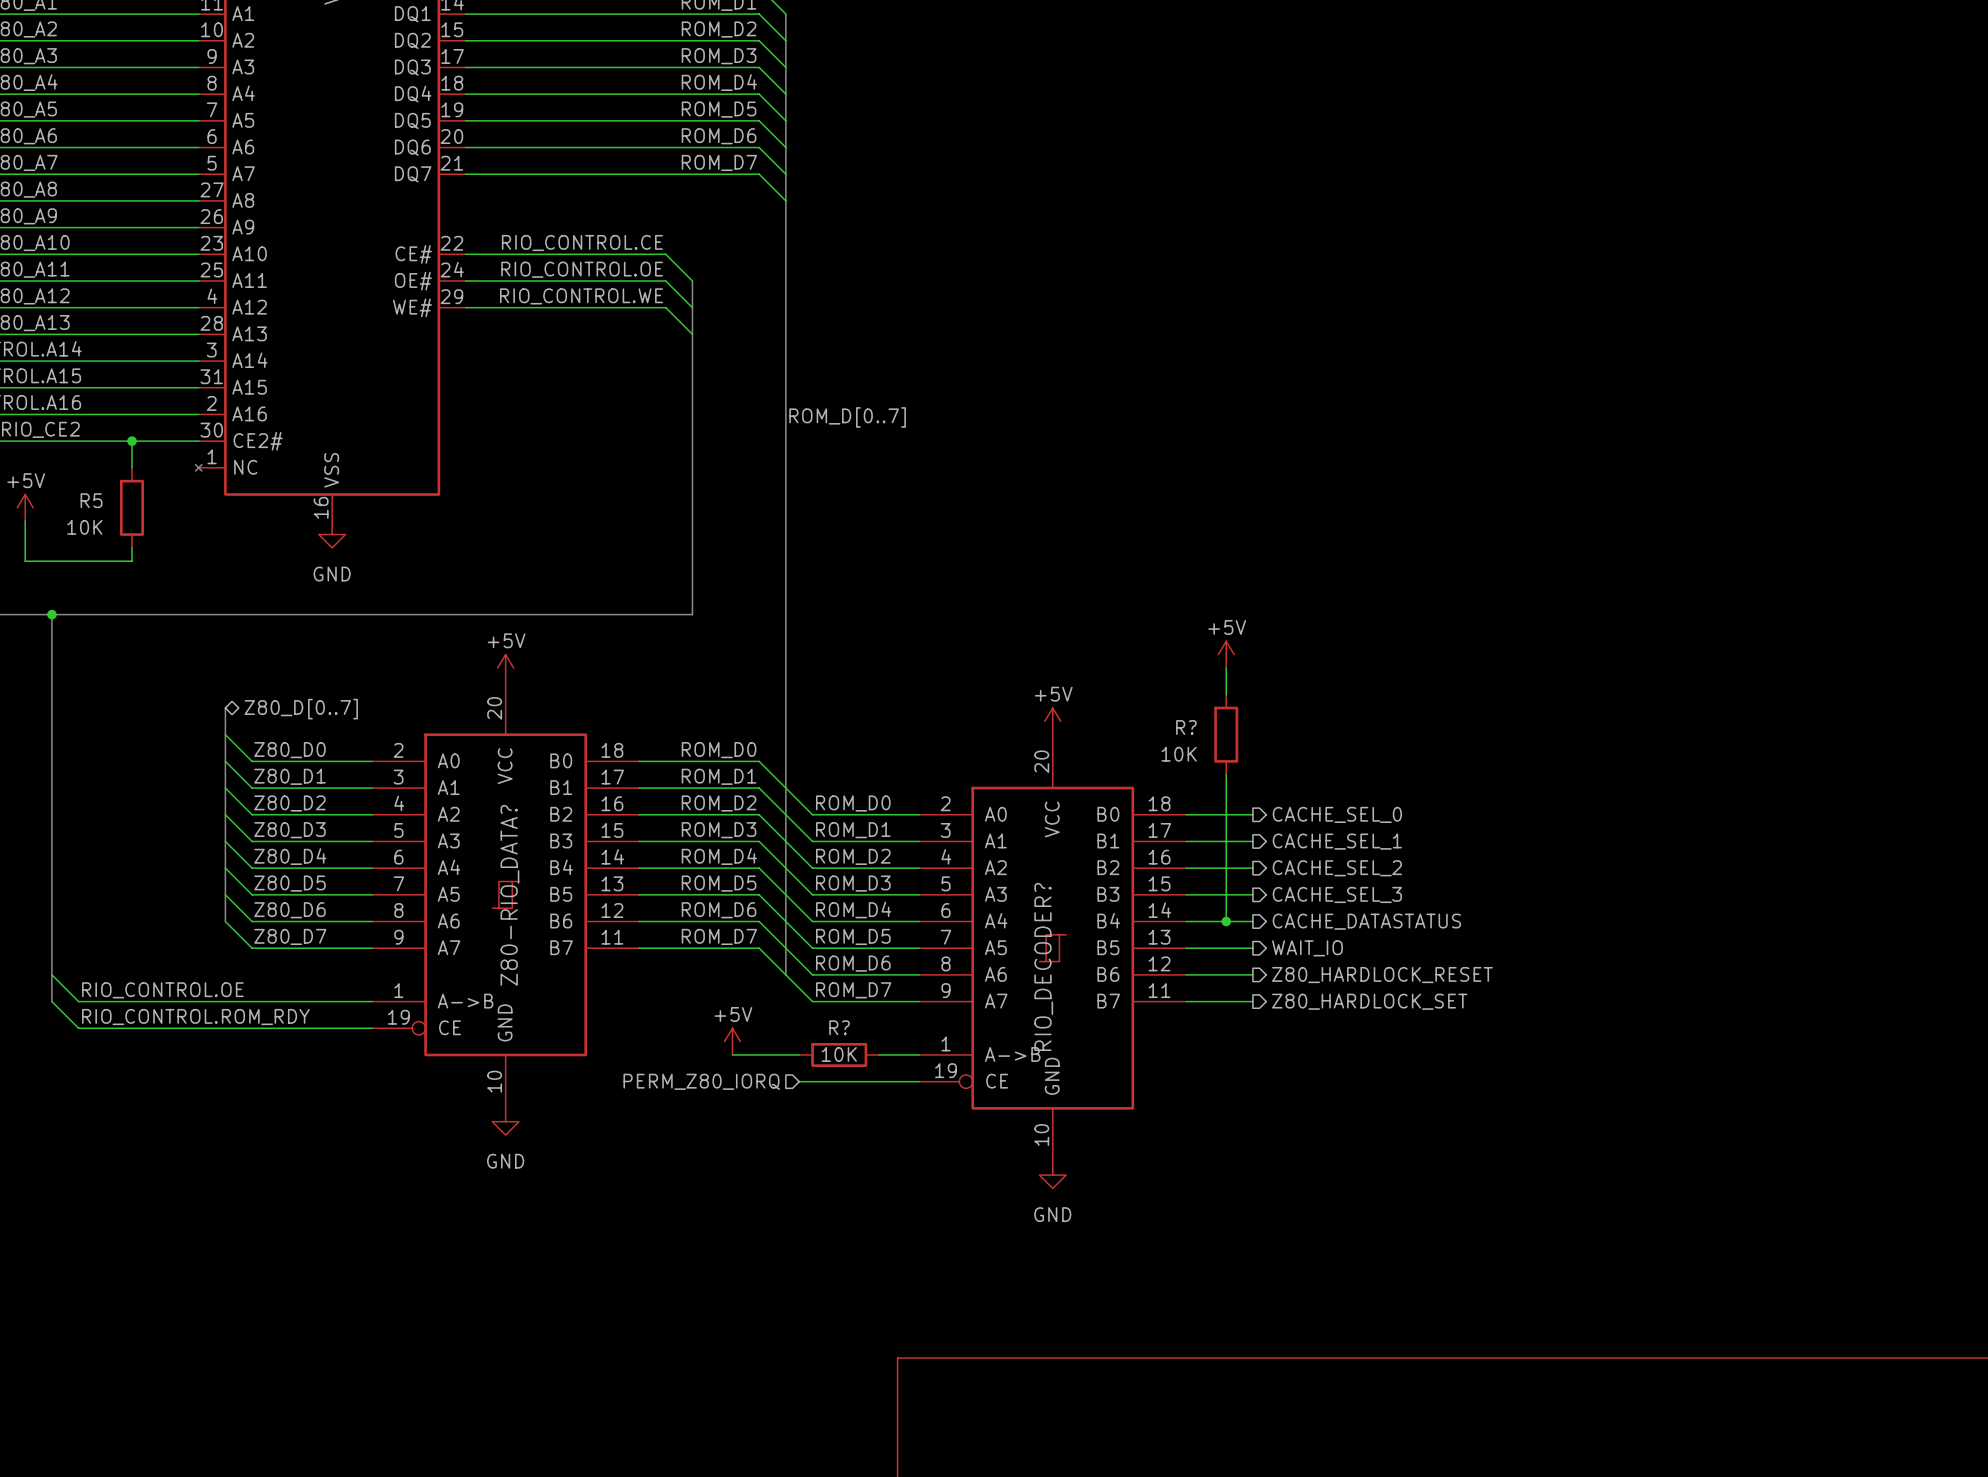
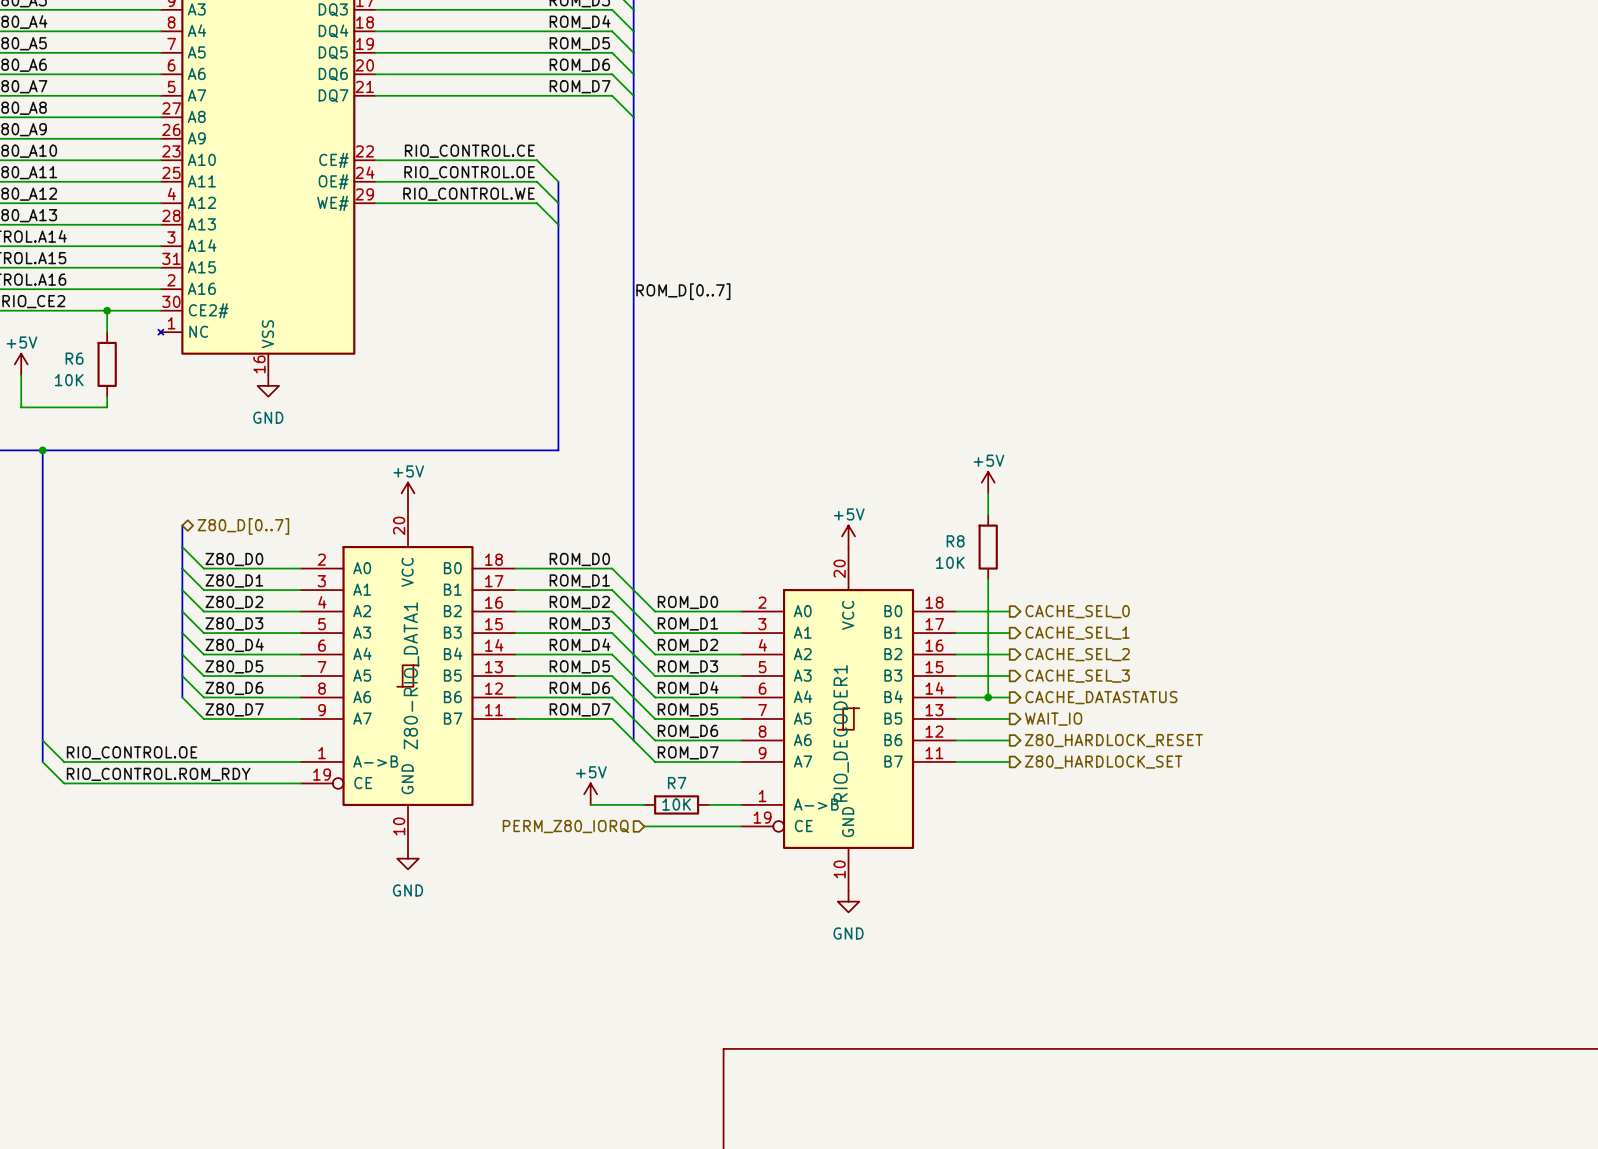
R5 name: R5 (91, 500) -> R6 (74, 358)
R? name: R? (1186, 727) -> R8 (955, 541)
Z80-RIO_DATA? name: Z80-RIO_DATA? (509, 895) -> Z80-RIO_DATA1 (411, 675)
RIO_DECODER? name: RIO_DECODER? (1043, 966) -> RIO_DECODER1 (841, 733)
R? name: R? (839, 1027) -> R7 (677, 783)

